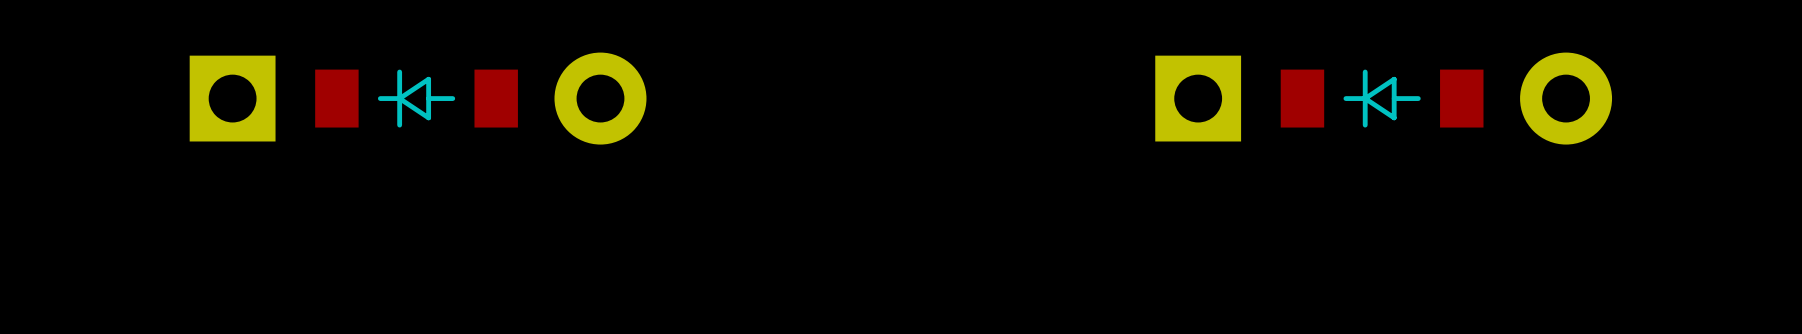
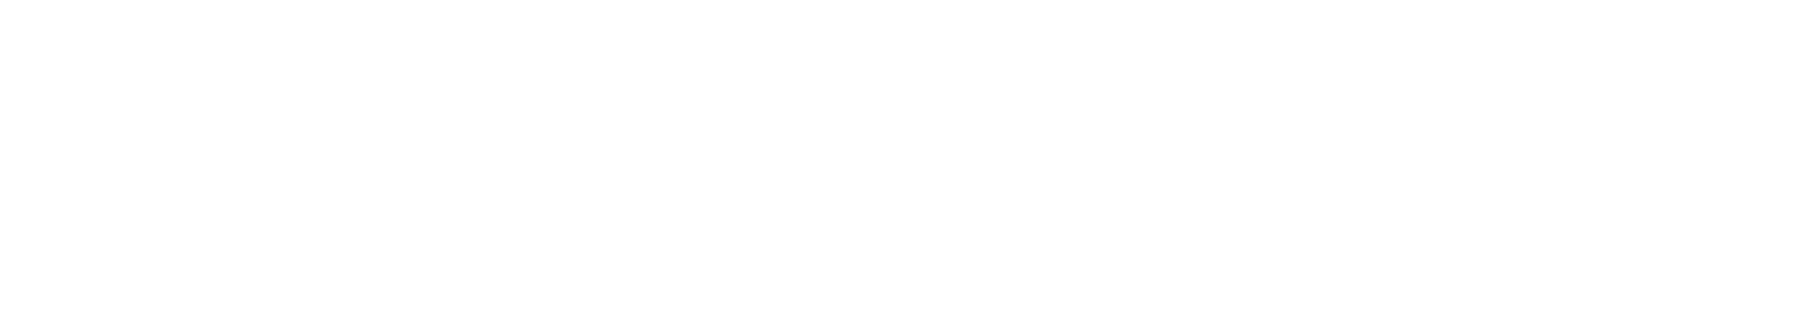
part: (418, 98) -> none
part: (1383, 98) -> none

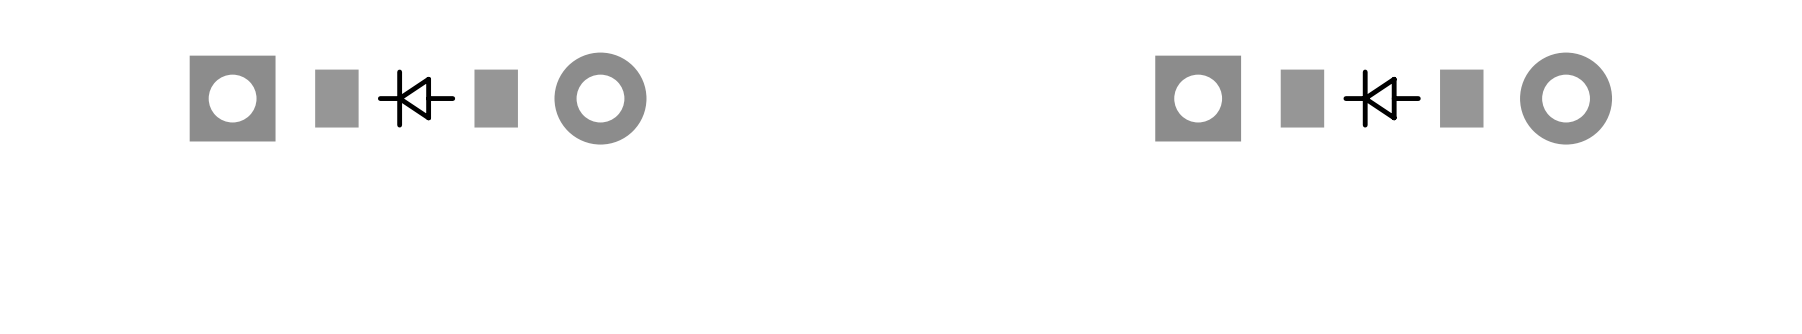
part: none -> (418, 98)
part: none -> (1383, 98)

